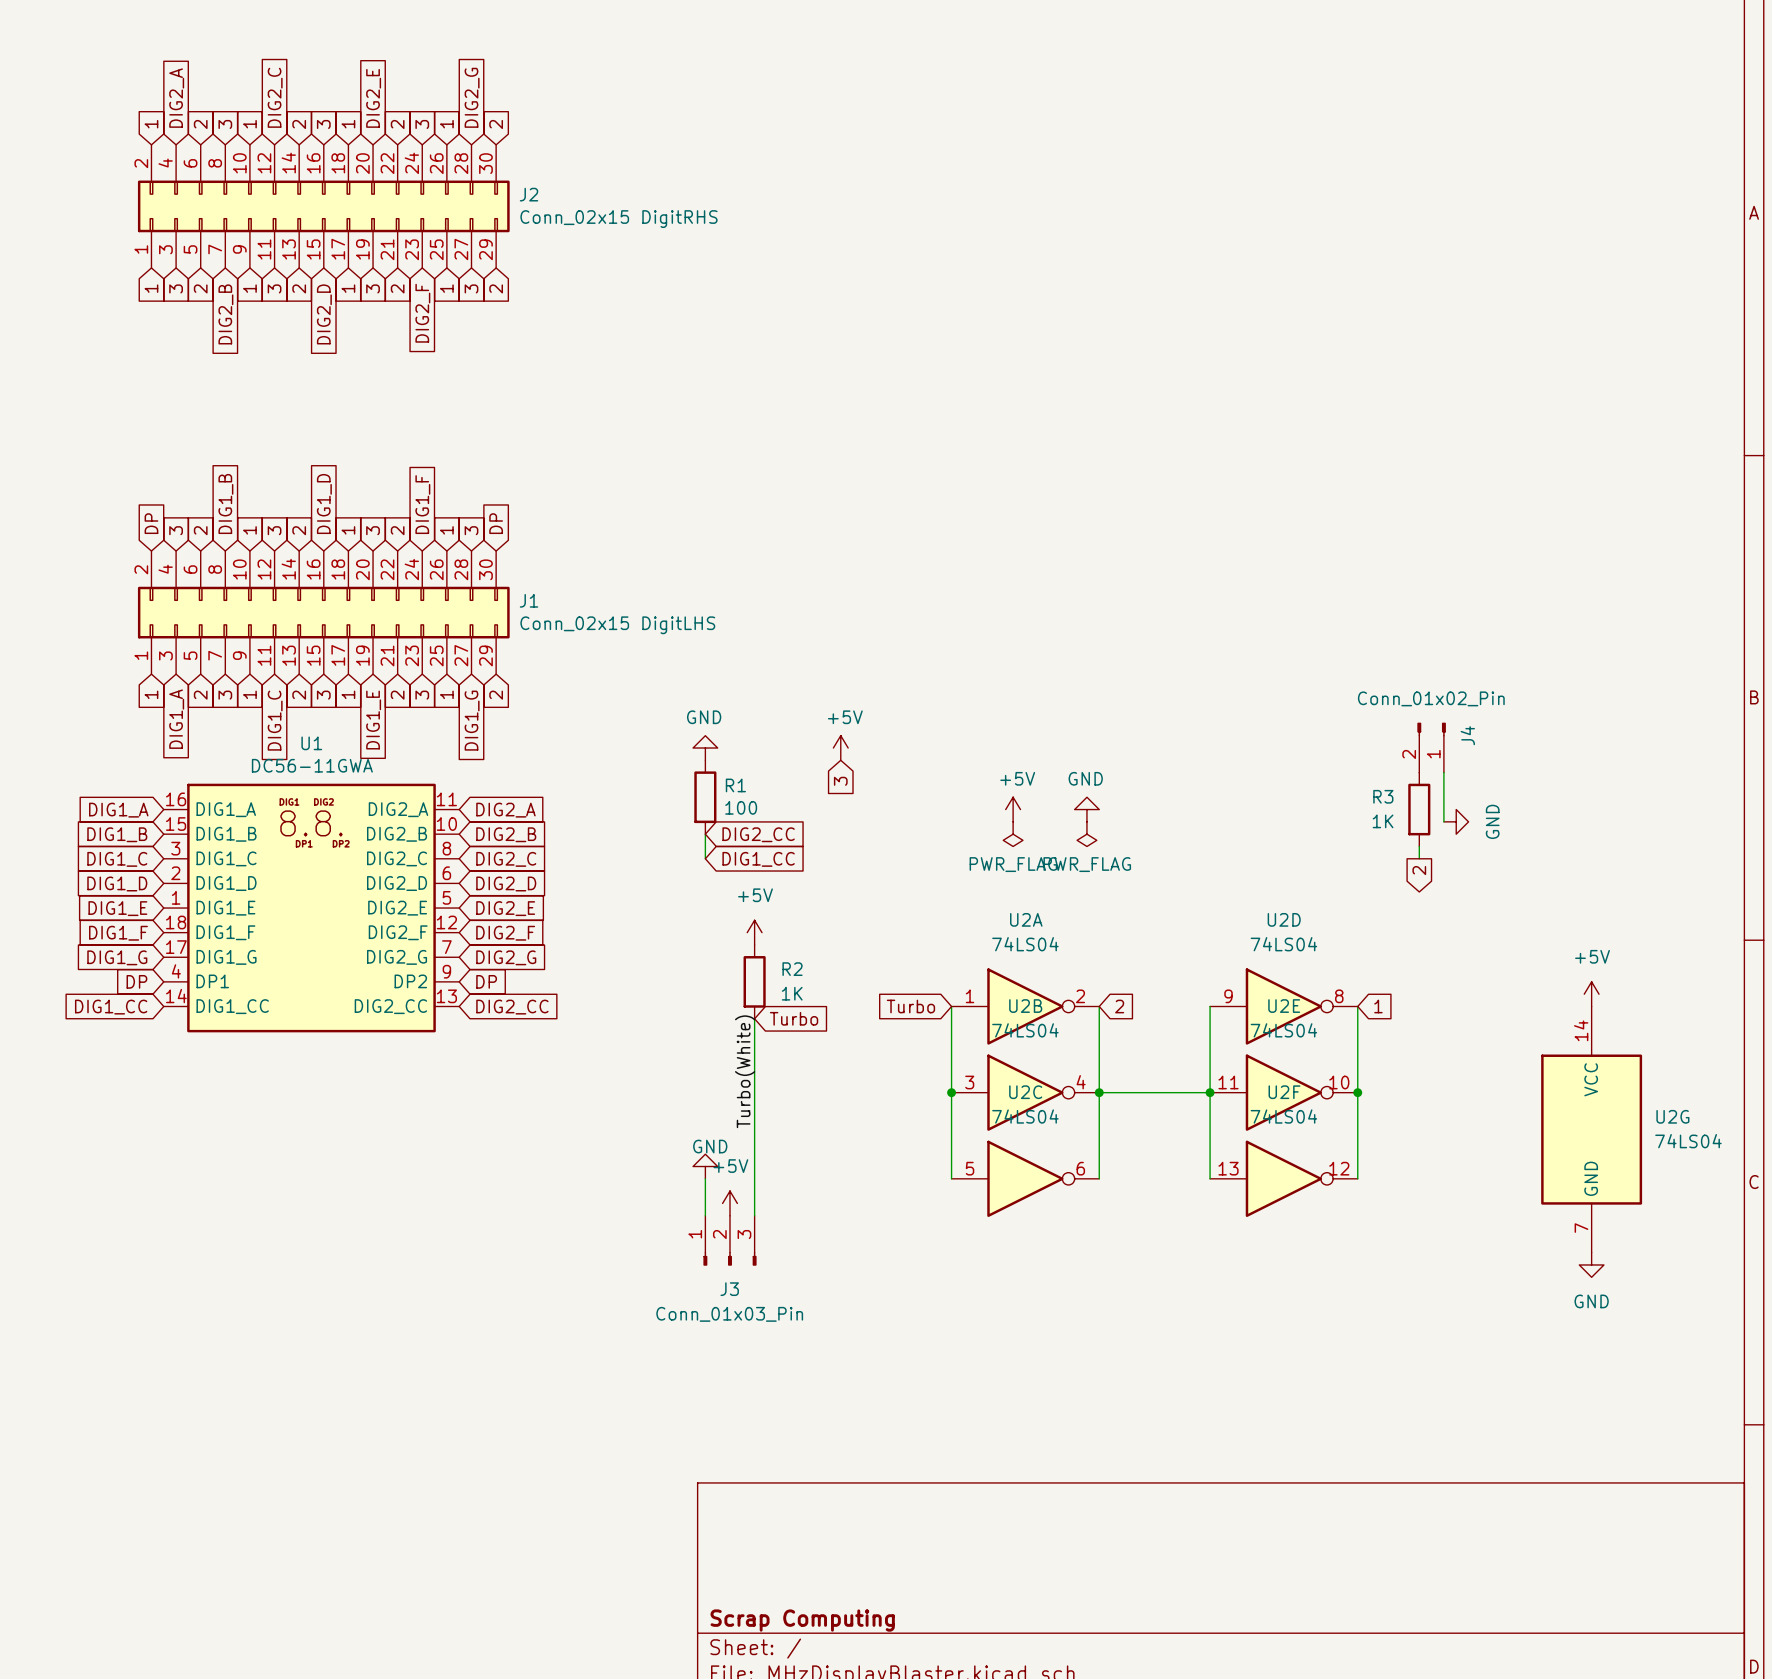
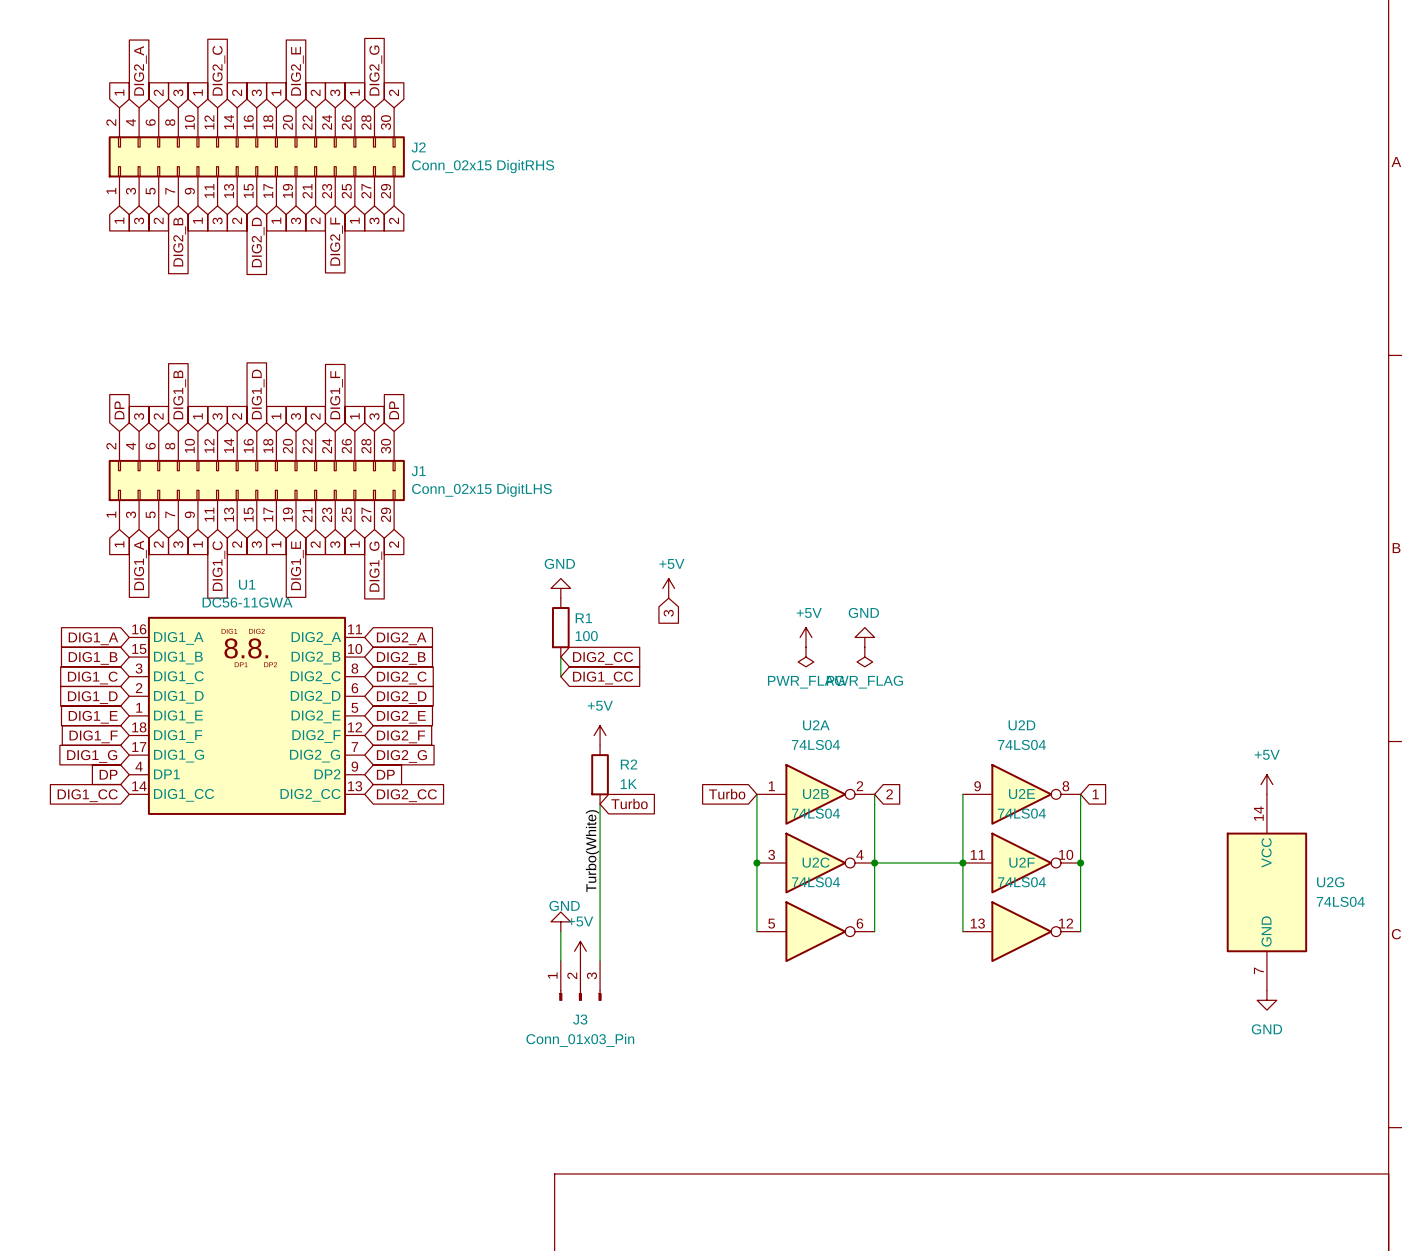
J4: Conn_01x02_Pin (1431, 747) -> none
wire: (1443, 772) (1443, 821) -> none
R3: 1K (1419, 809) -> none
power symbol: GND (1456, 821) -> none
wire: (1419, 846) (1419, 858) -> none
global label: 2 (1419, 870) -> none

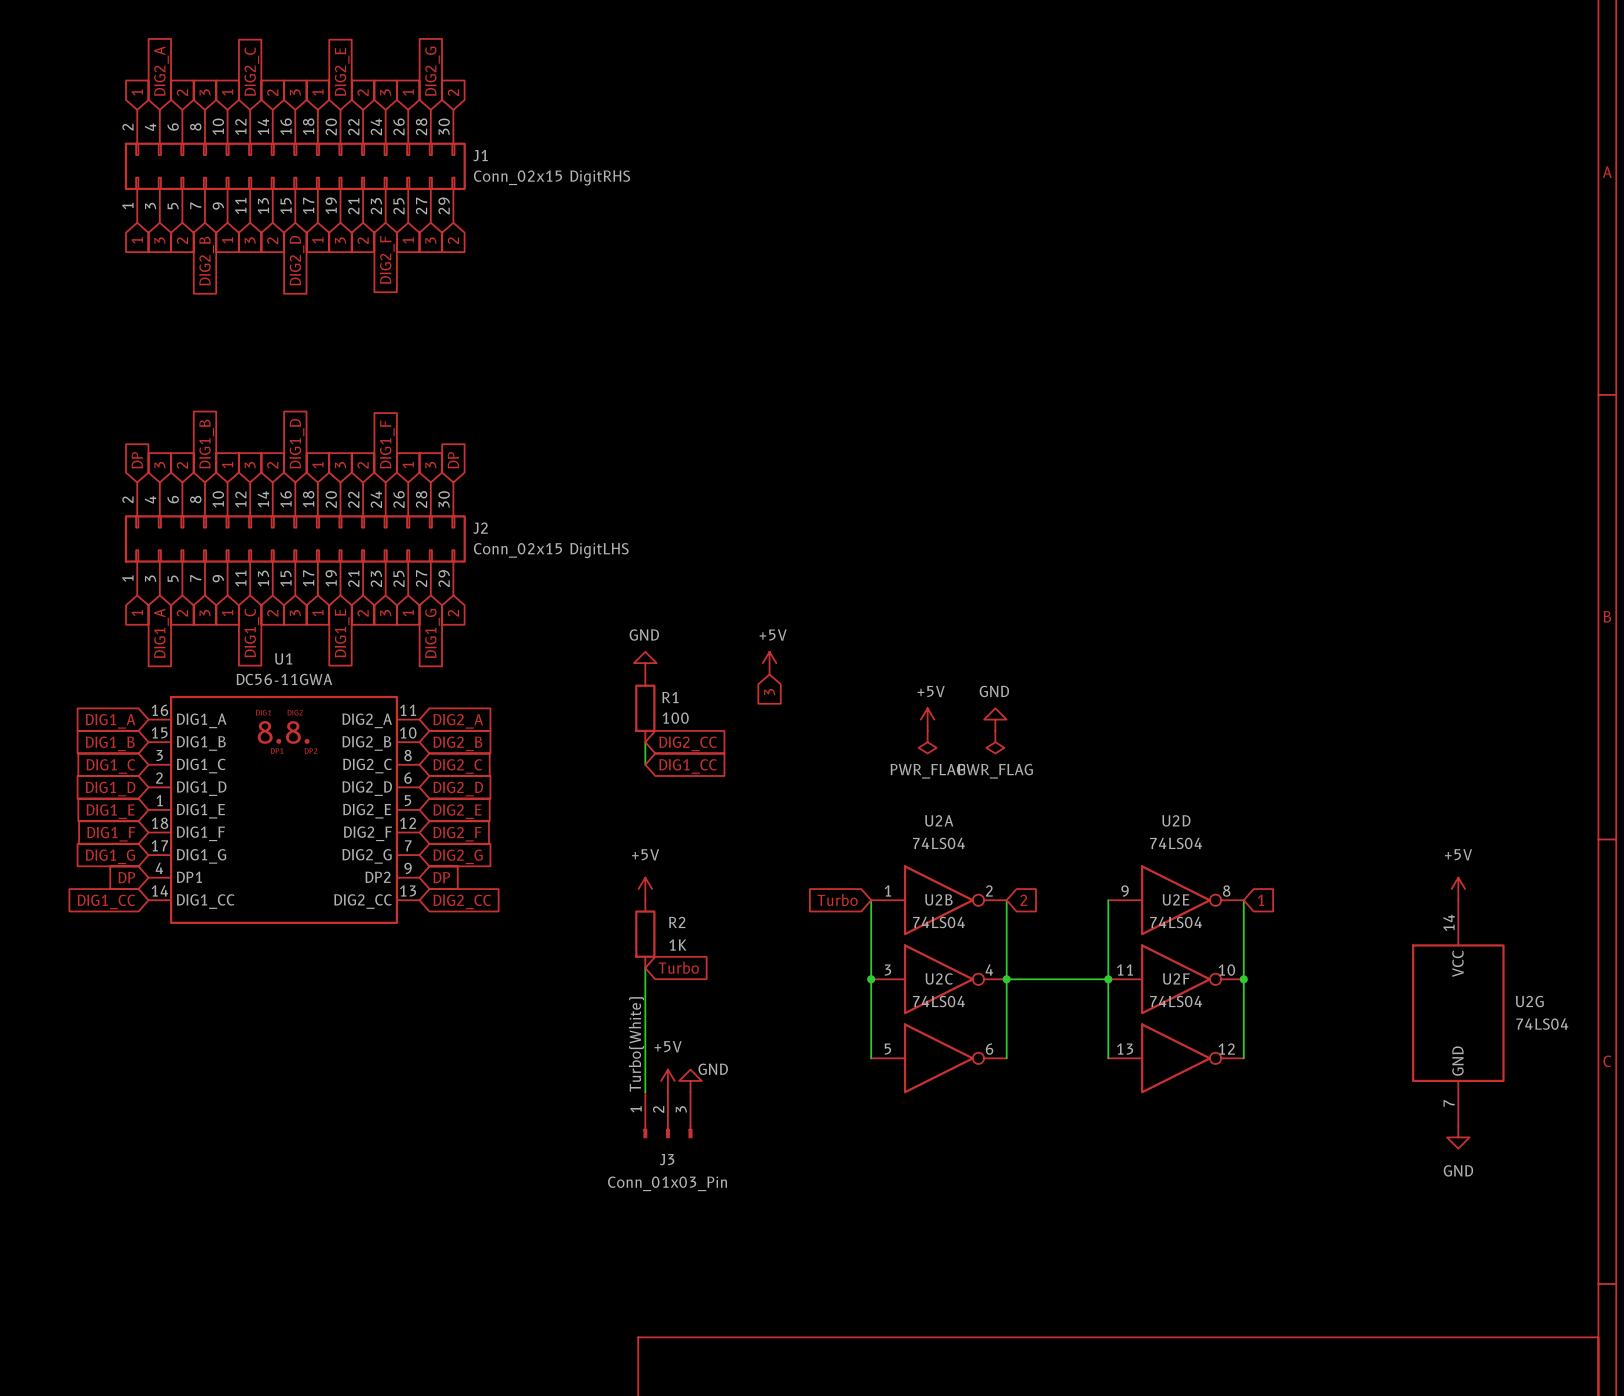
J2 name: J2 (418, 147) -> J1 (480, 155)
J1 name: J1 (418, 471) -> J2 (480, 528)
power symbol position: +5V (600, 735) -> +5V (645, 888)
R2 position: (600, 774) -> (645, 934)
global label position: Turbo (629, 803) -> Turbo (678, 967)
wire: (600, 804) (600, 961) -> none
label position: Turbo(White) (592, 851) -> Turbo(White) (636, 1044)
wire: none -> (645, 968) (645, 1058)
power symbol text position: GND (564, 905) -> GND (713, 1069)
power symbol position: GND (560, 921) -> GND (690, 1080)

